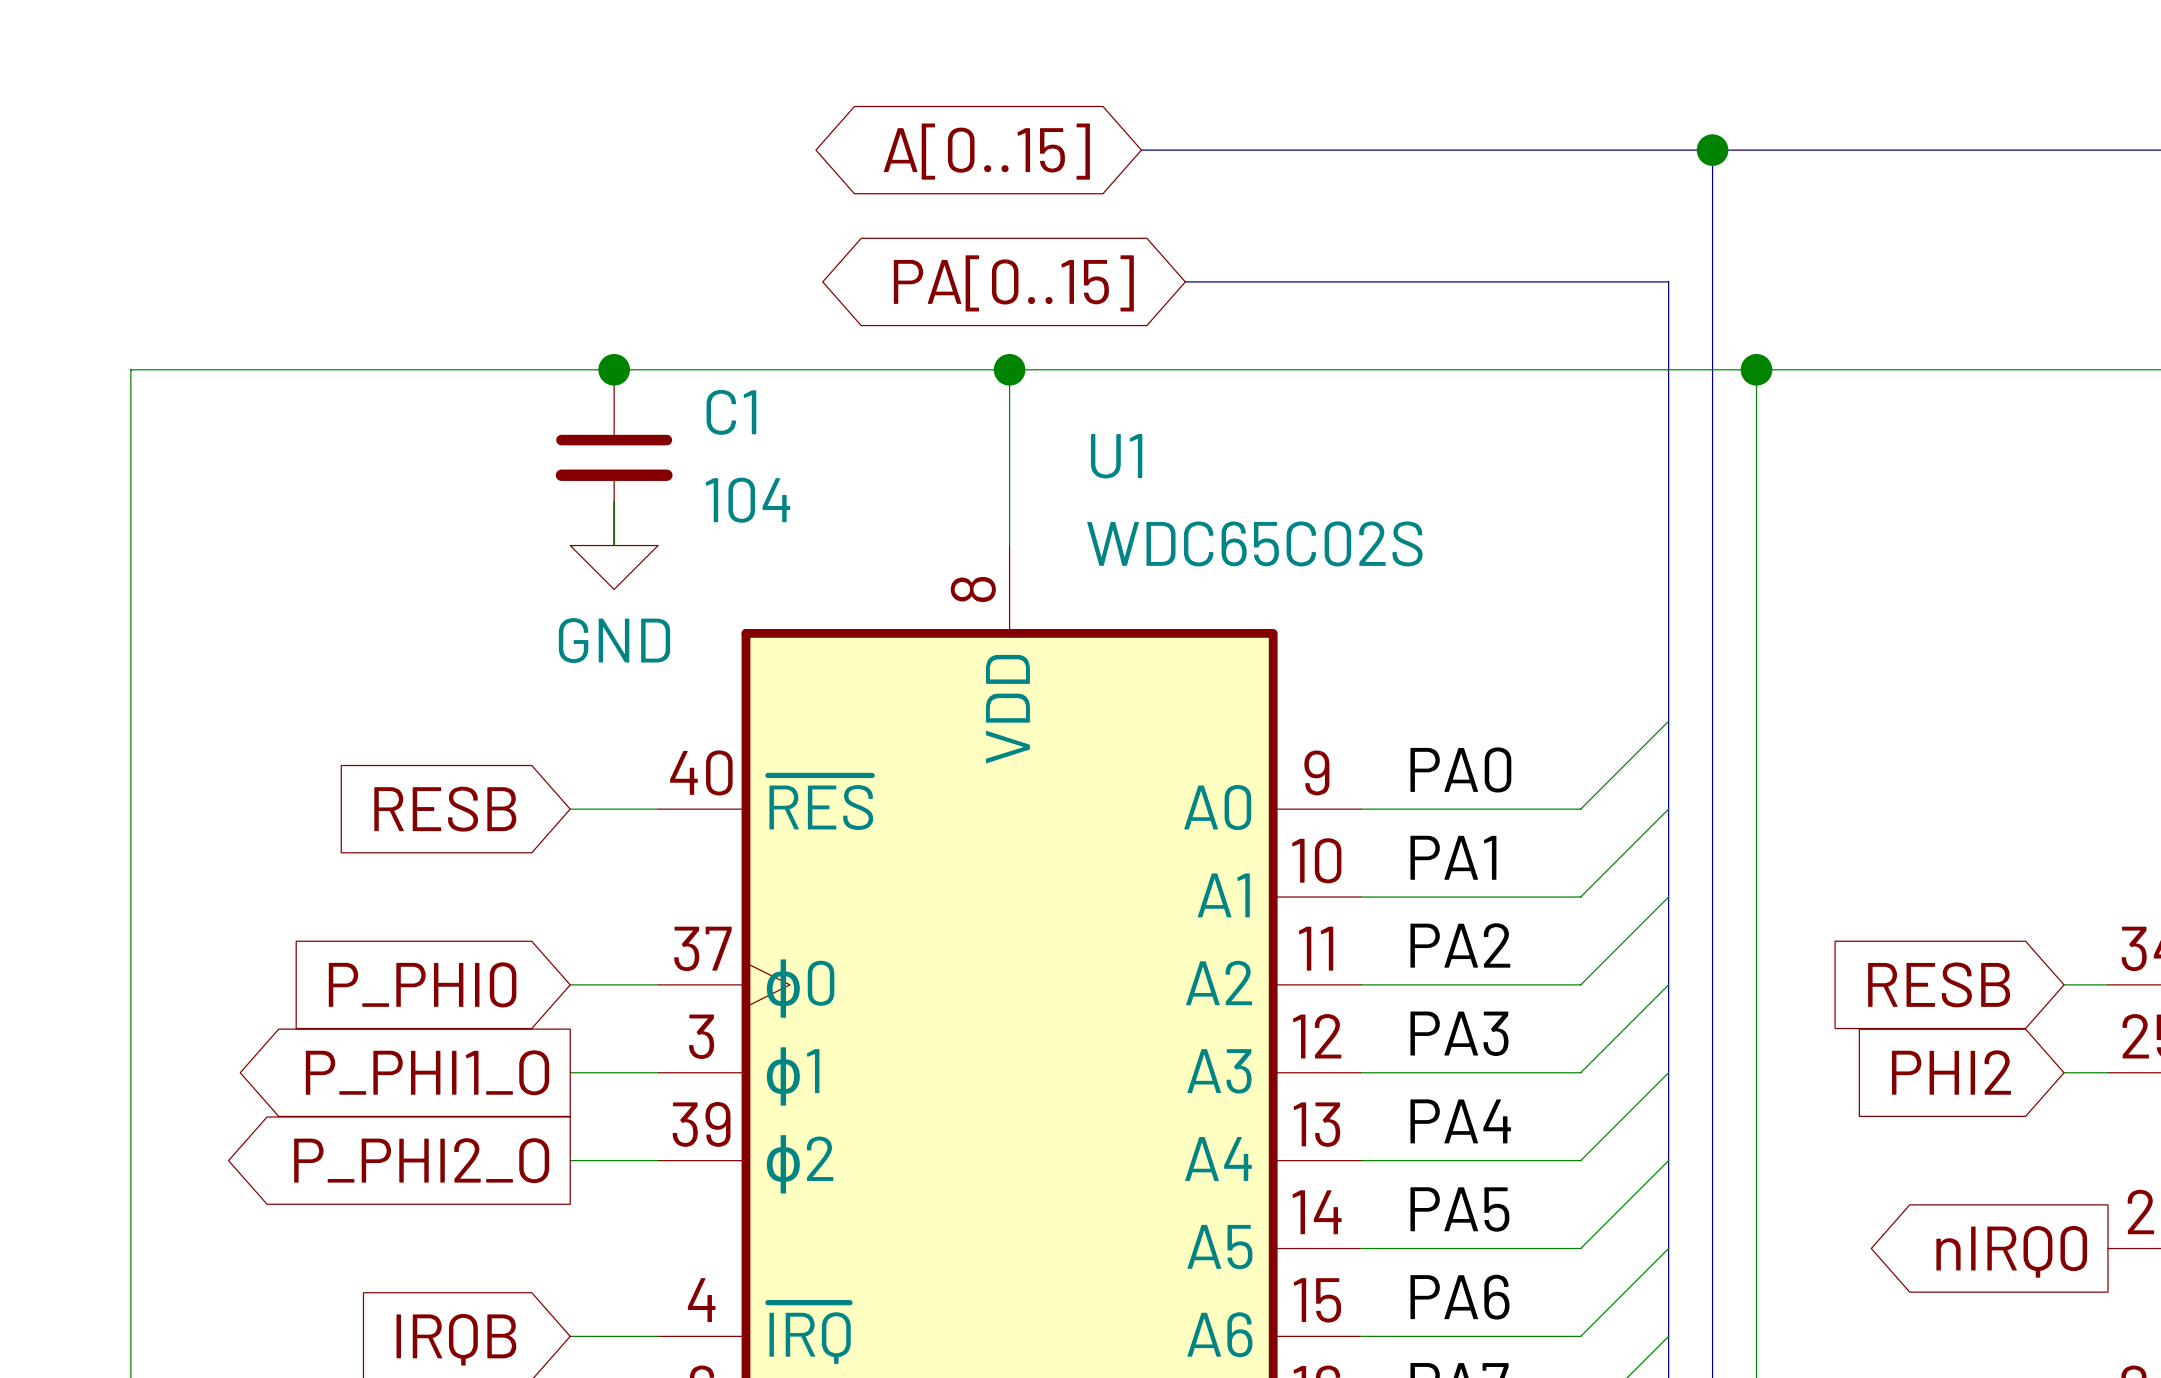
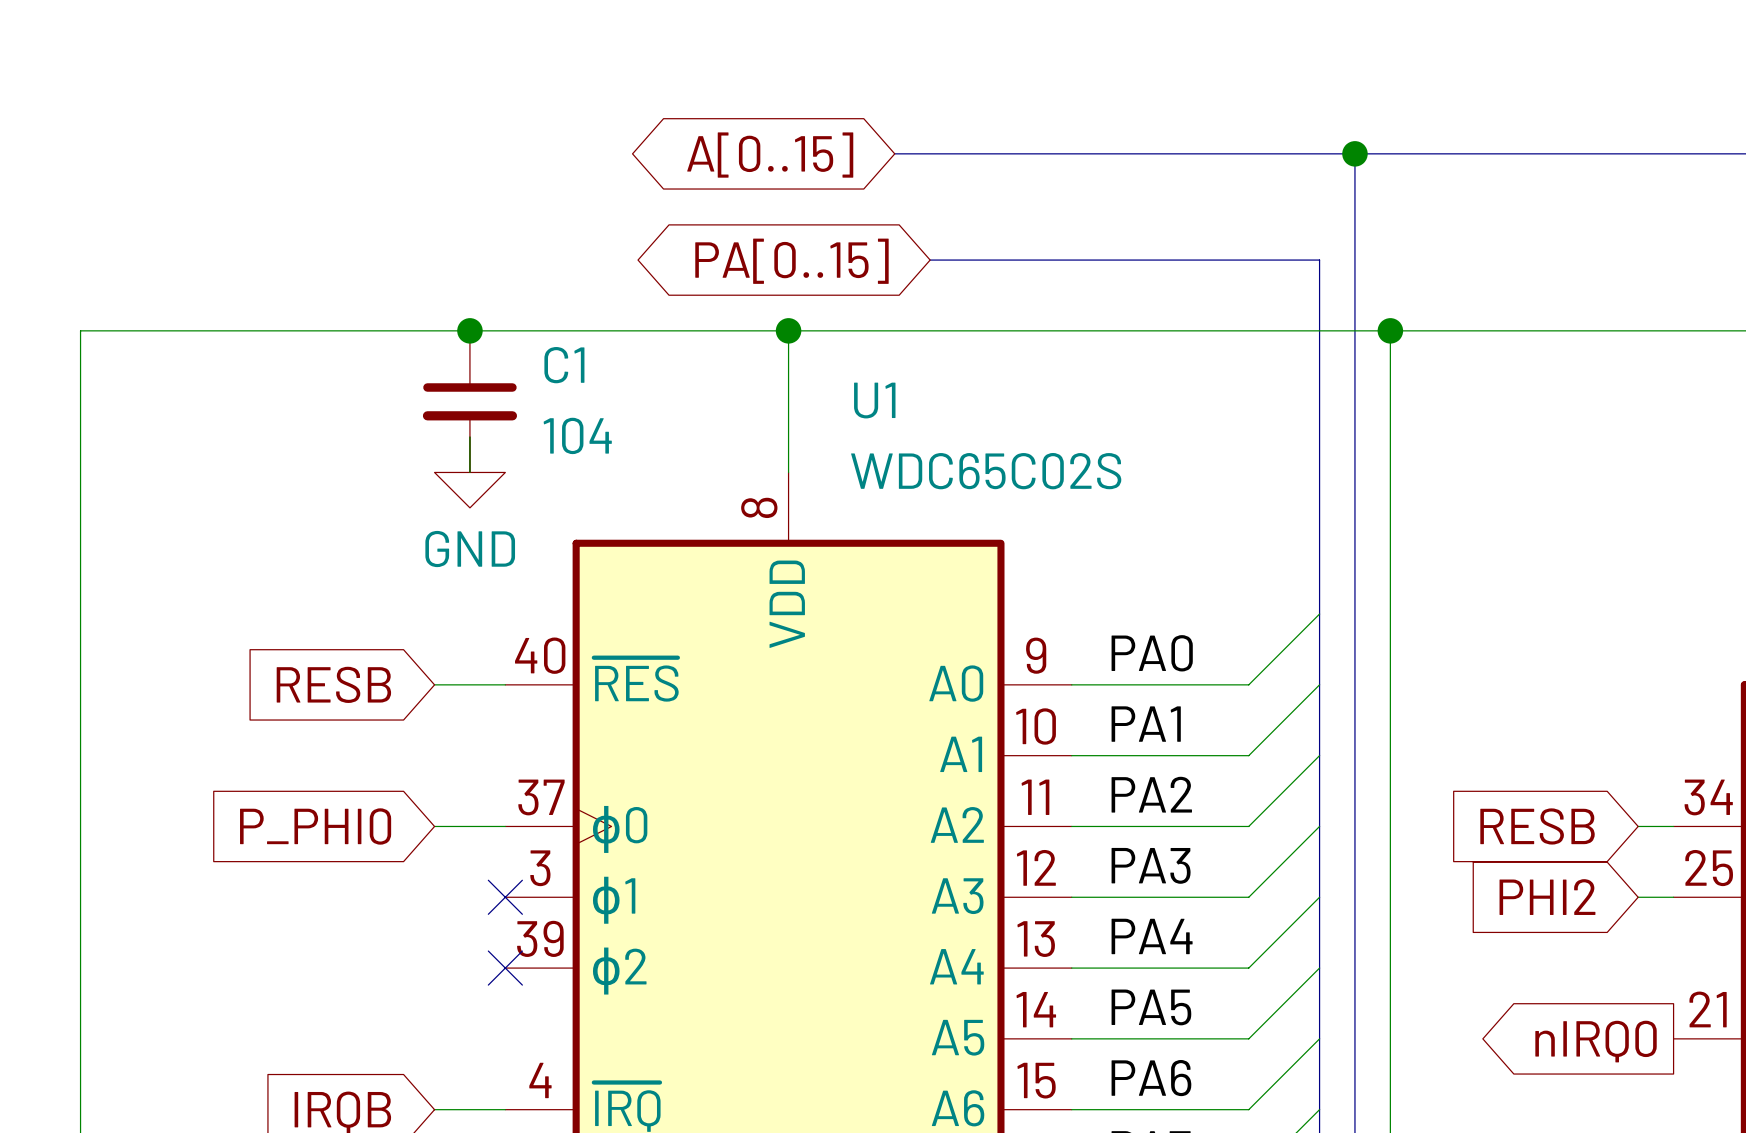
global label: P_PHI1_O (427, 1072) -> none
wire: (570, 1072) (658, 1072) -> none
no-connect mark: none -> (505, 897)
global label: P_PHI2_O (421, 1160) -> none
wire: (570, 1160) (658, 1160) -> none
no-connect mark: none -> (505, 968)

